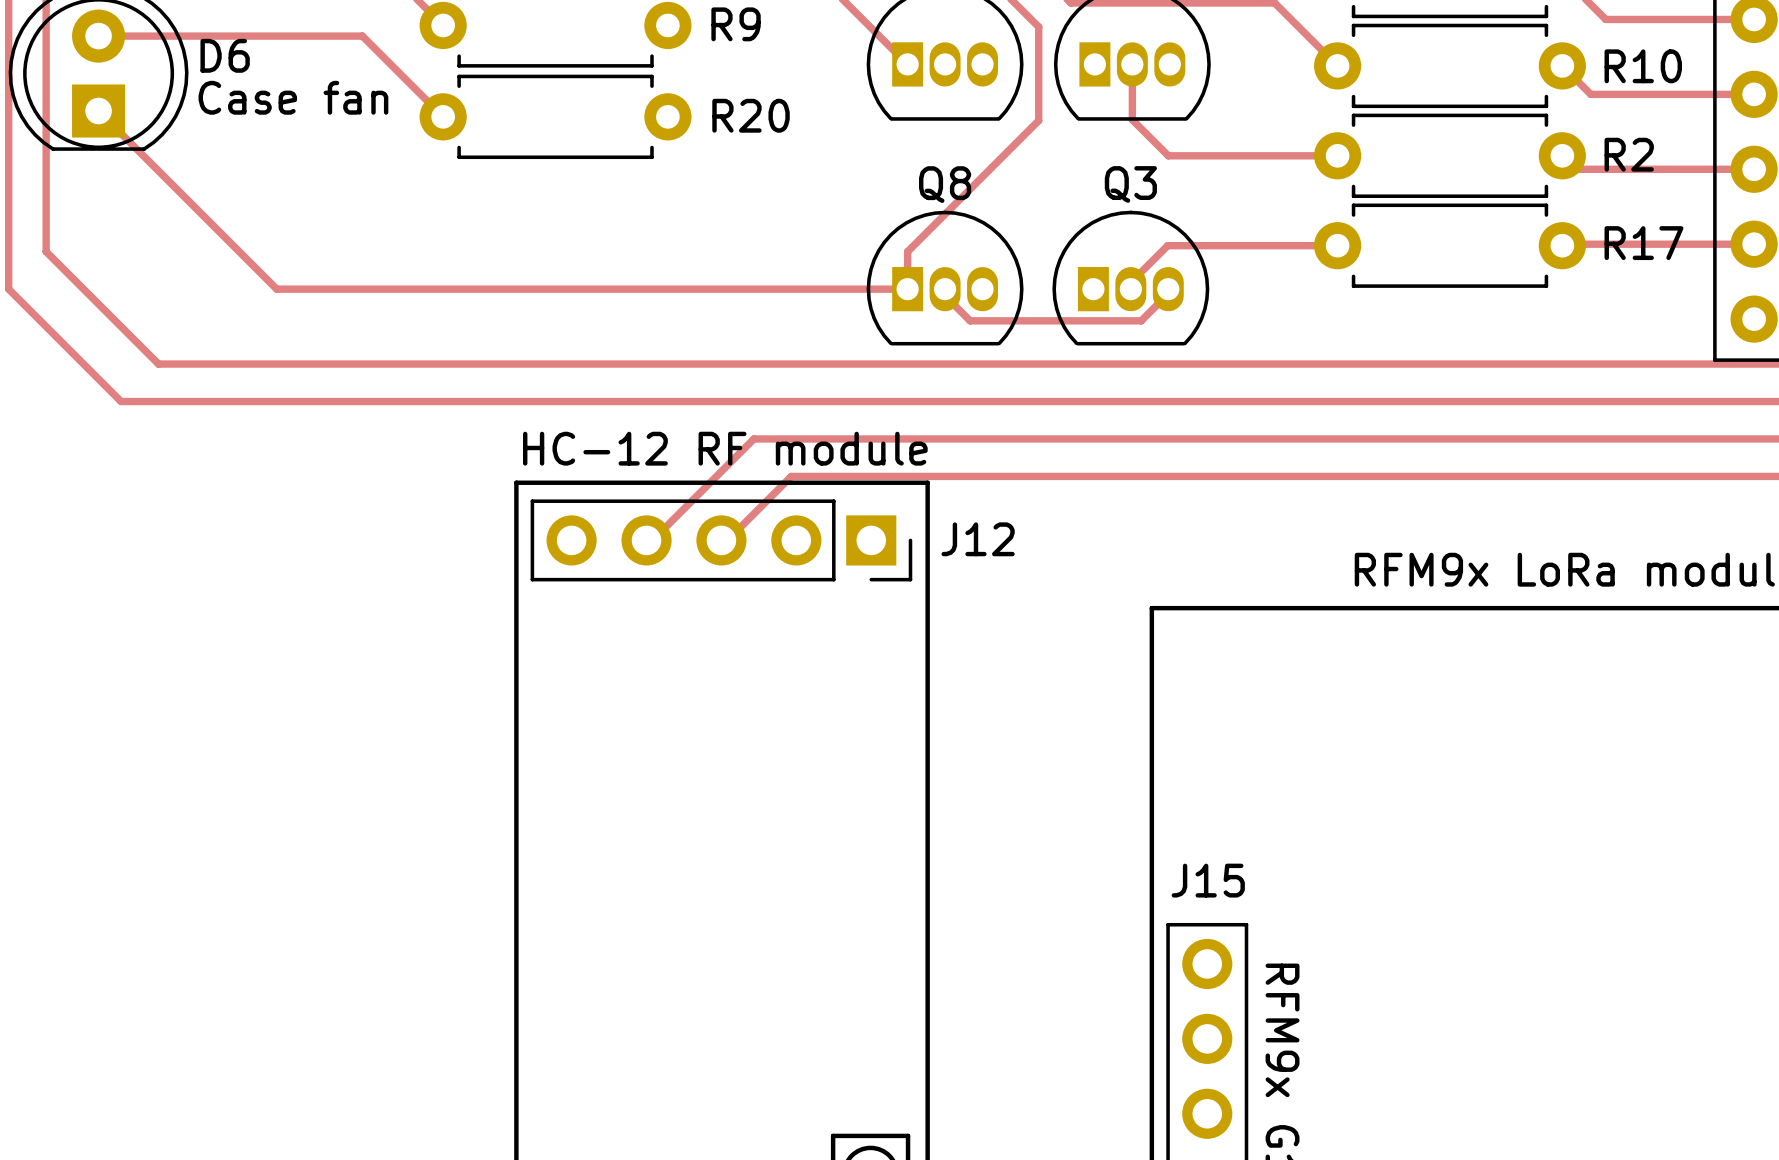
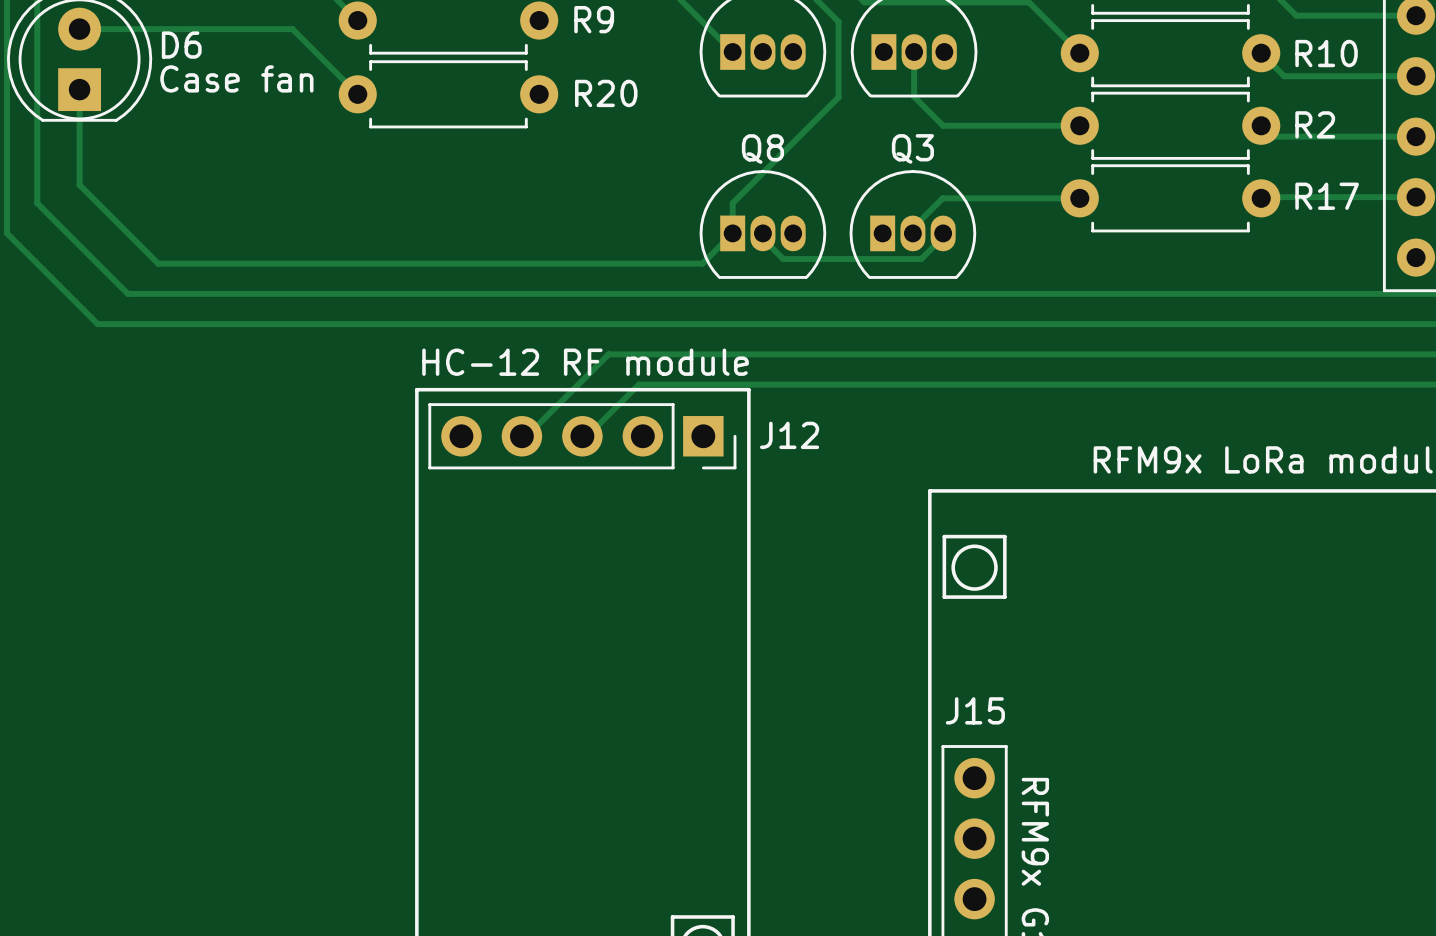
track: (98, 111) (276, 289) (907, 289) -> (79, 89) (79, 185) (158, 263) (702, 263) (732, 233)
line: none -> (944, 536) (944, 597) (1004, 597) (1004, 536) (944, 536)
drawing: none -> [951, 544, 998, 591]

